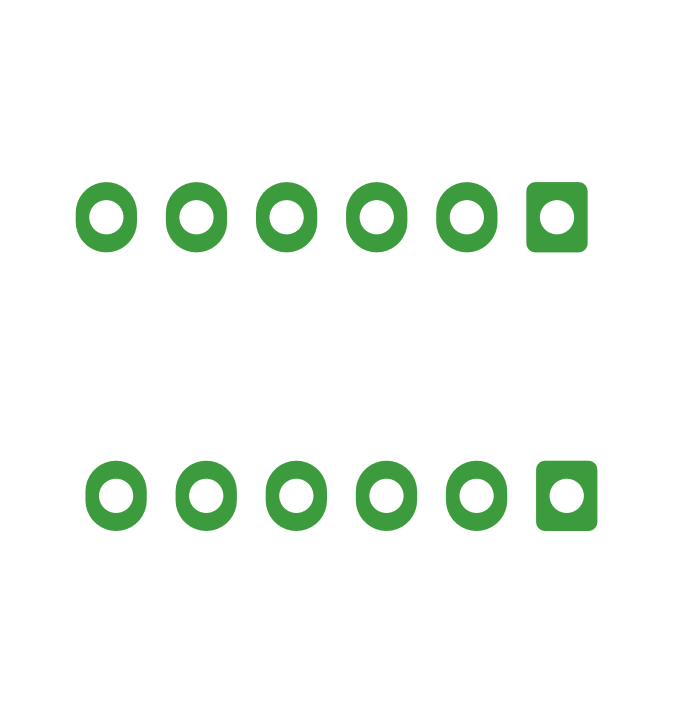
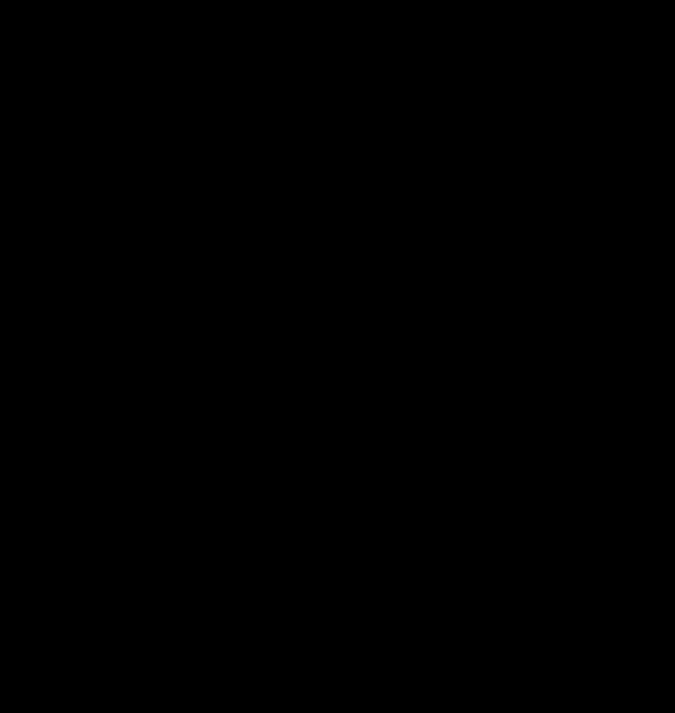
part: (331, 217) -> none
part: (341, 495) -> none

